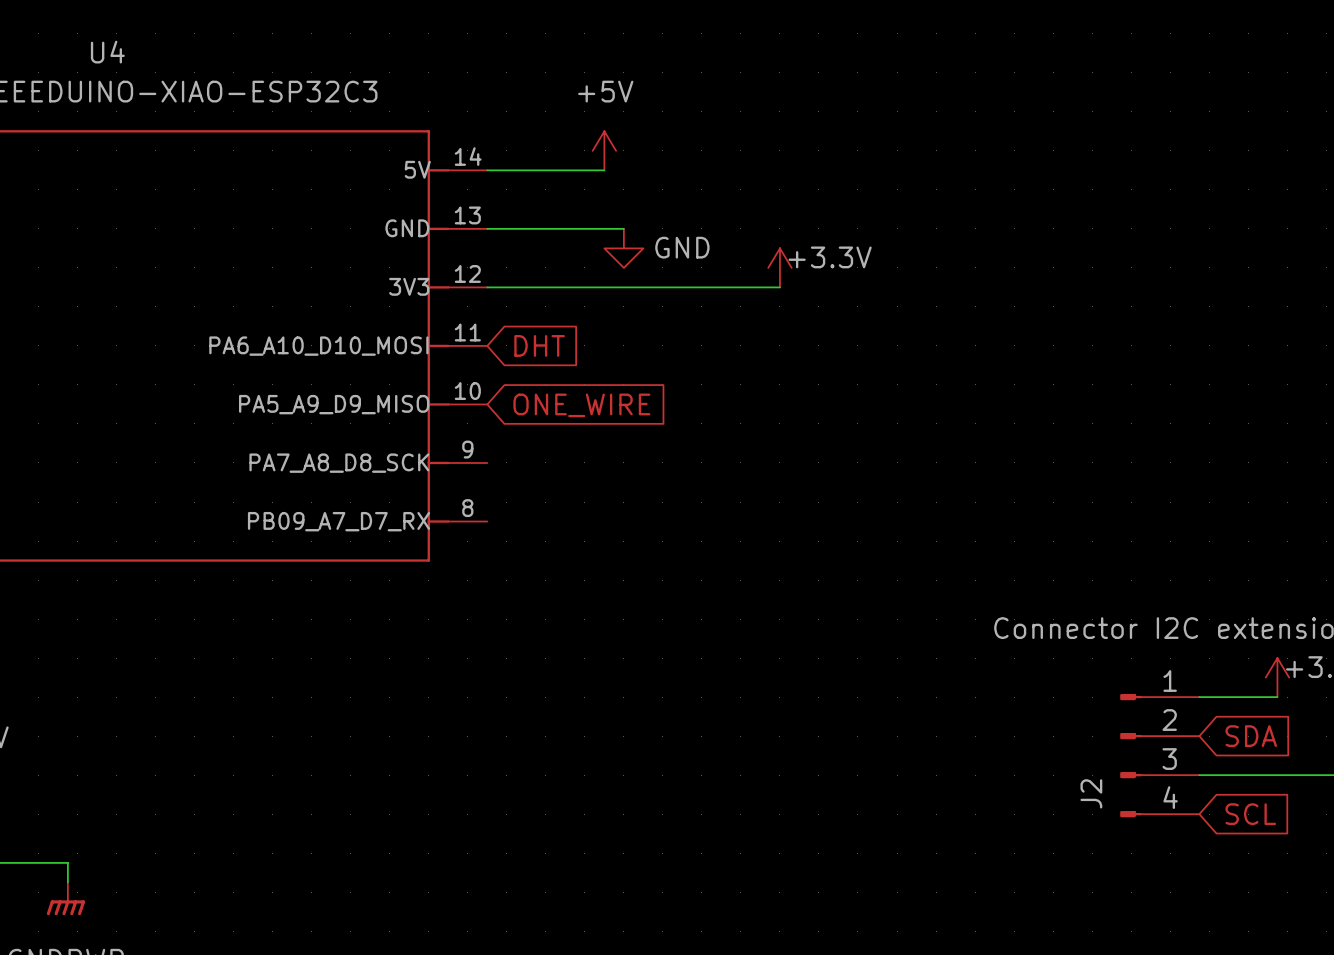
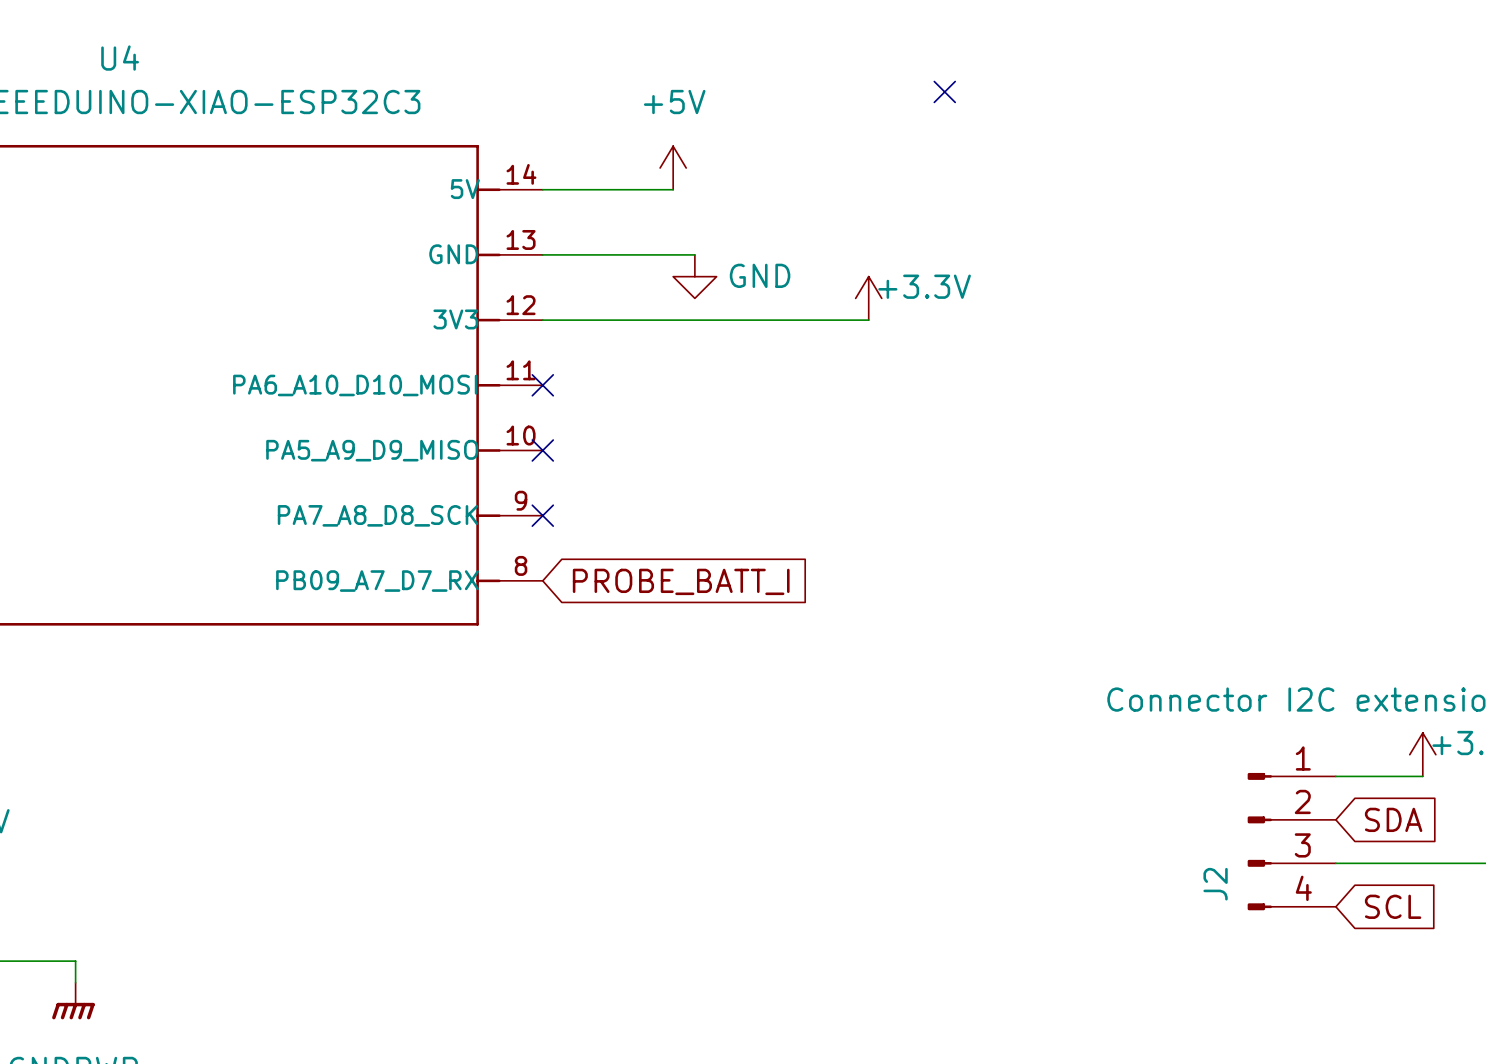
no-connect mark: none -> (944, 91)
no-connect mark: none -> (542, 385)
global label: DHT (539, 345) -> none
no-connect mark: none -> (542, 450)
global label: ONE_WIRE (581, 405) -> none
no-connect mark: none -> (542, 515)
global label: none -> PROBE_BATT_I (681, 581)

